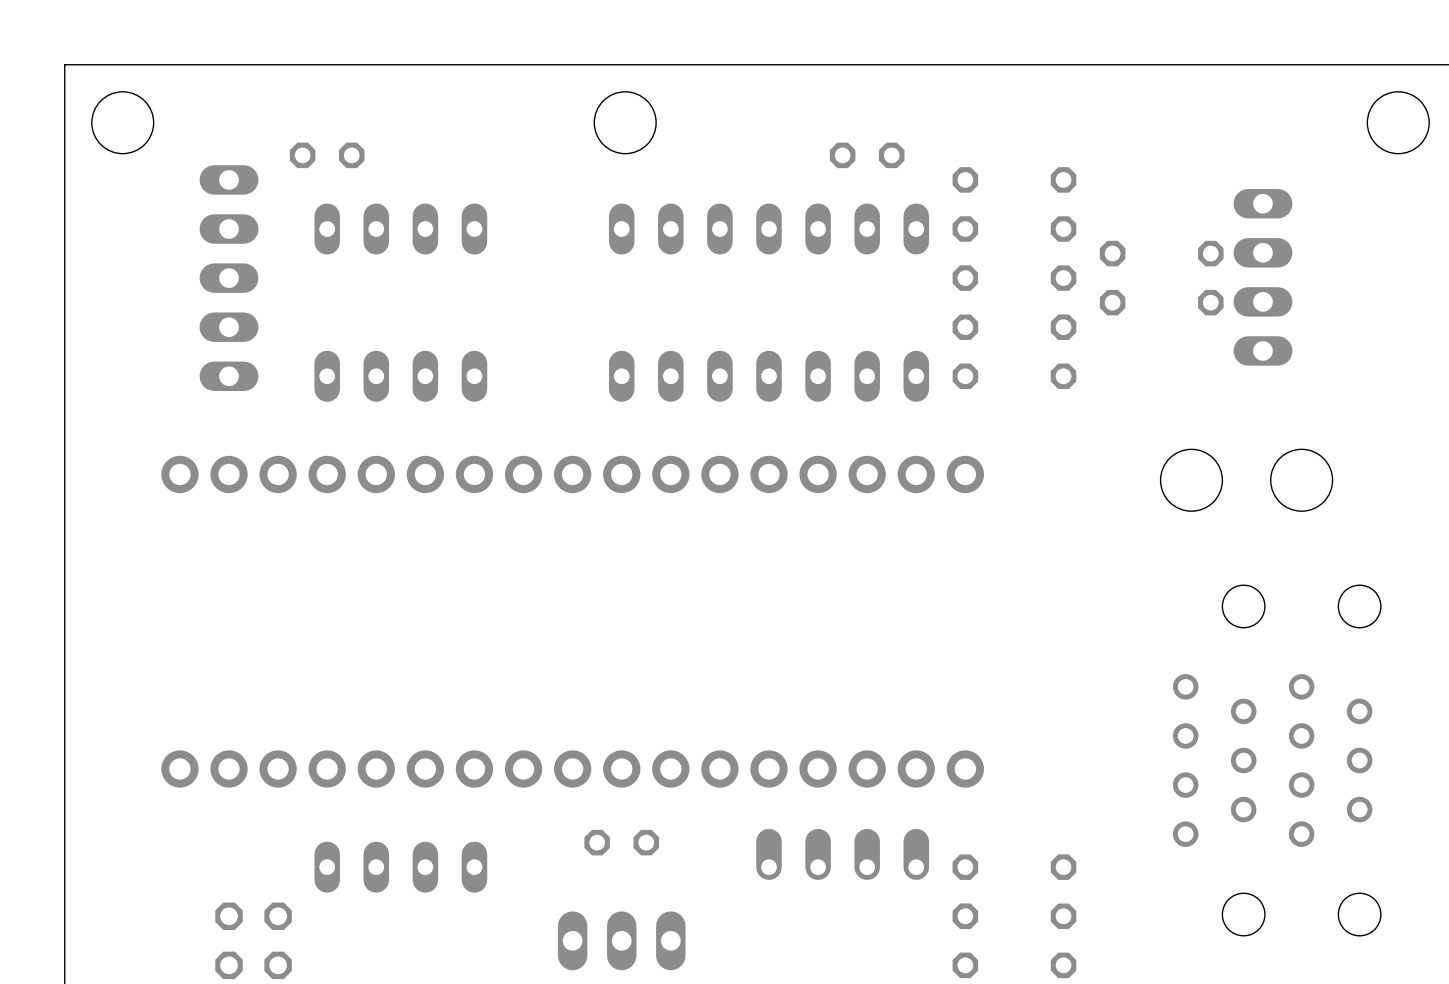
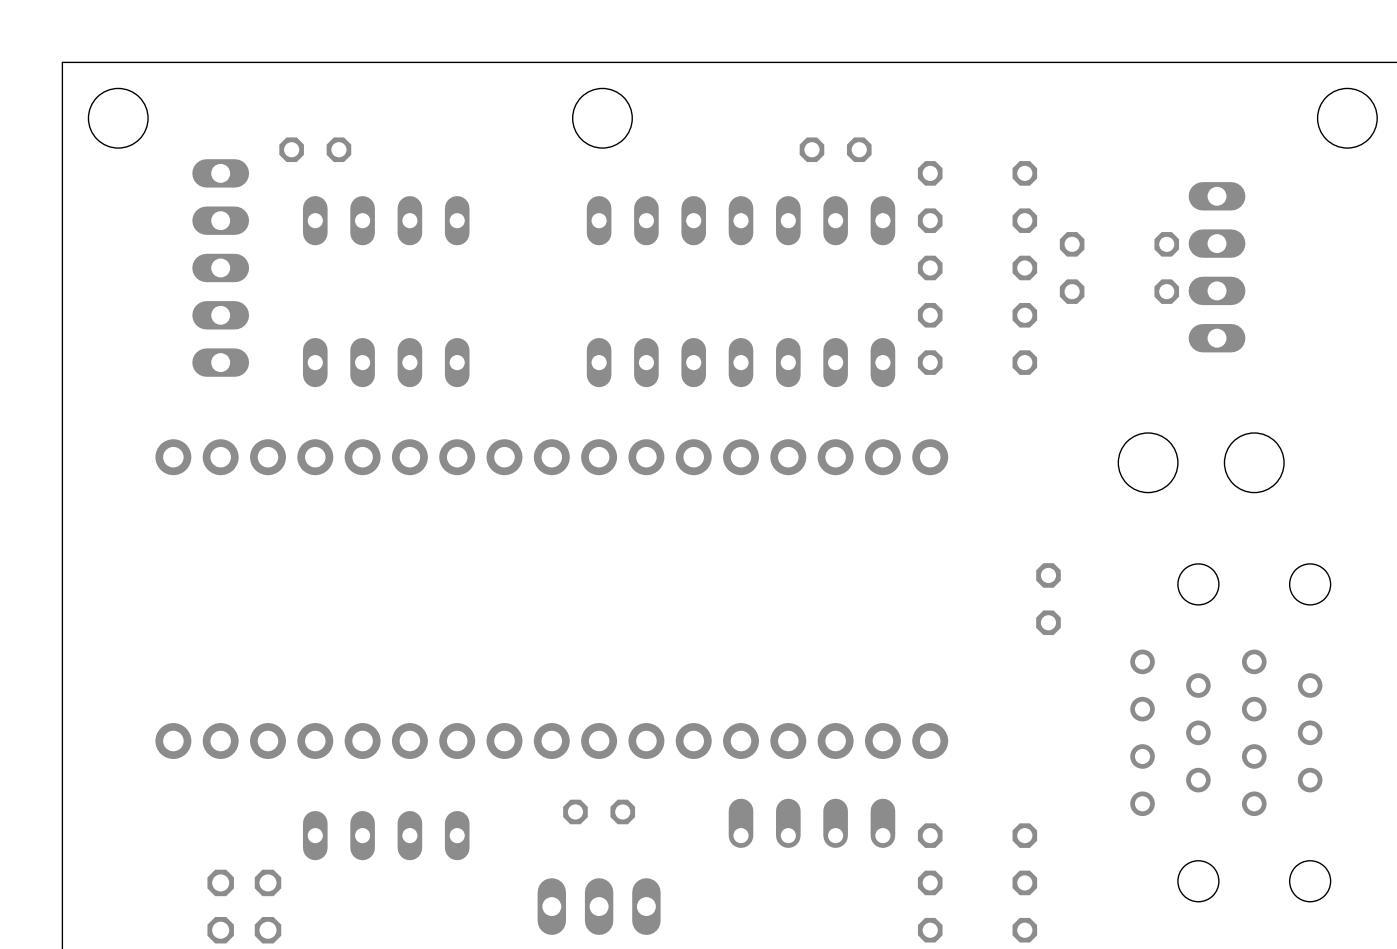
part: none -> (1048, 599)

